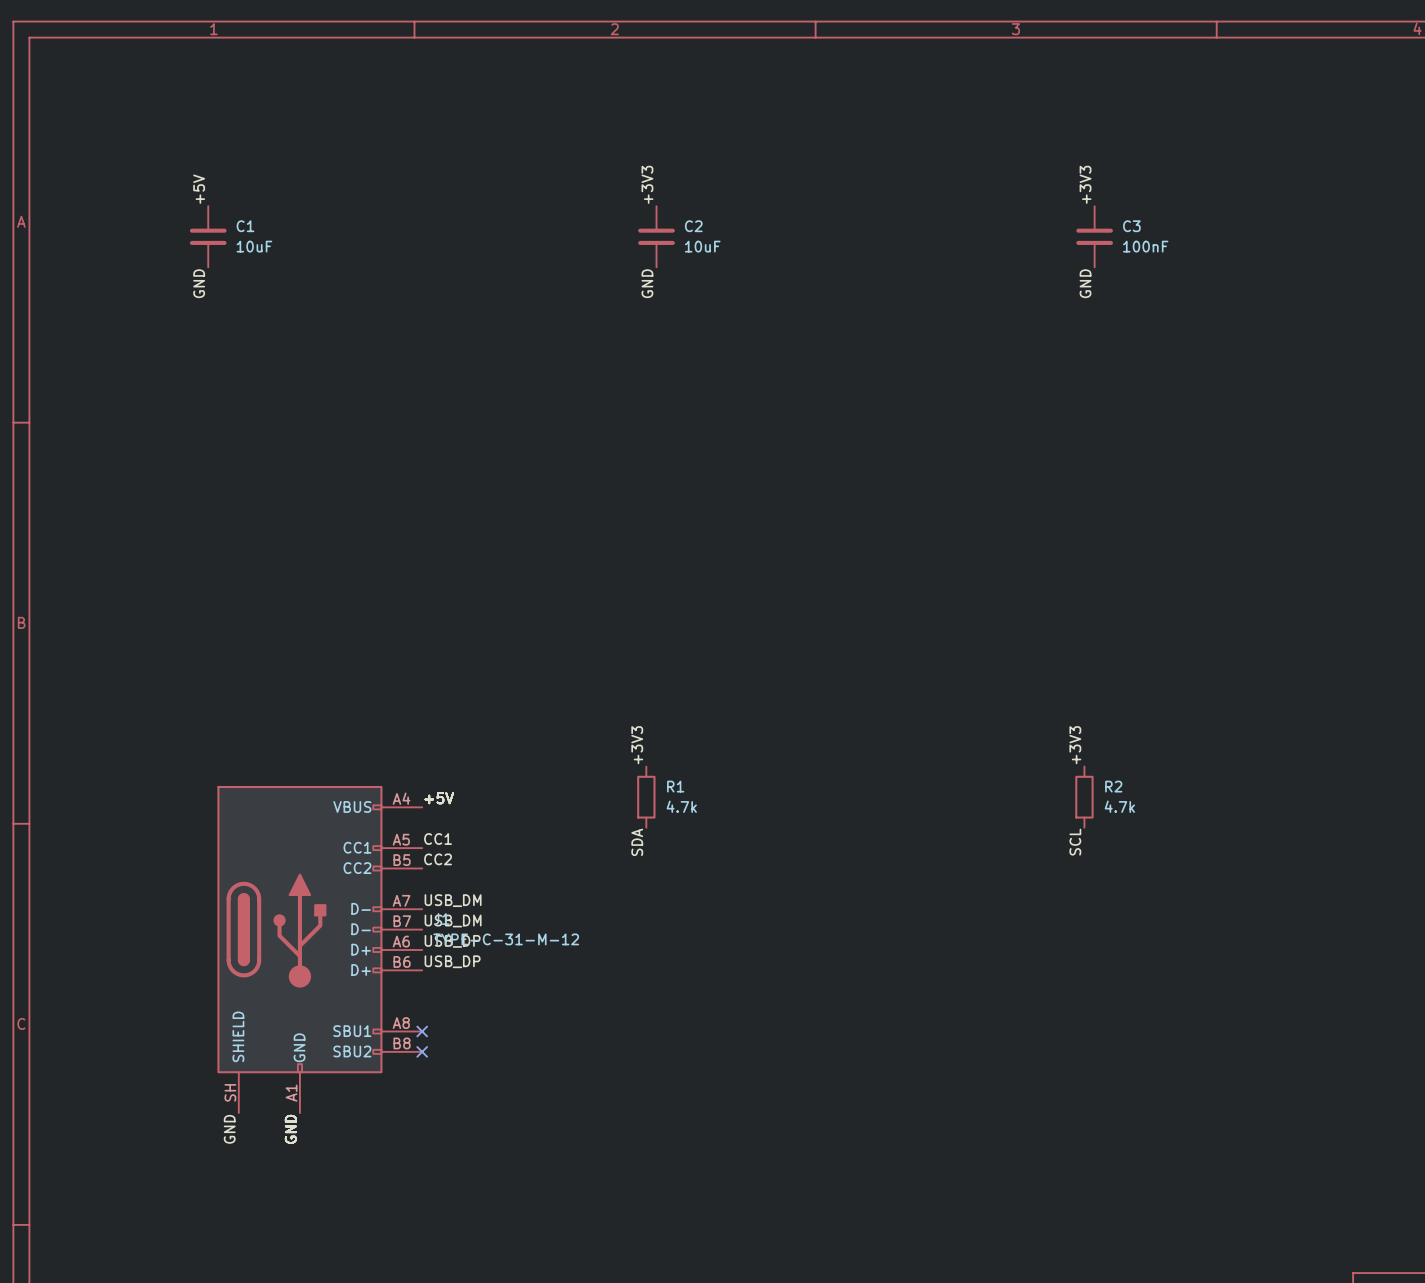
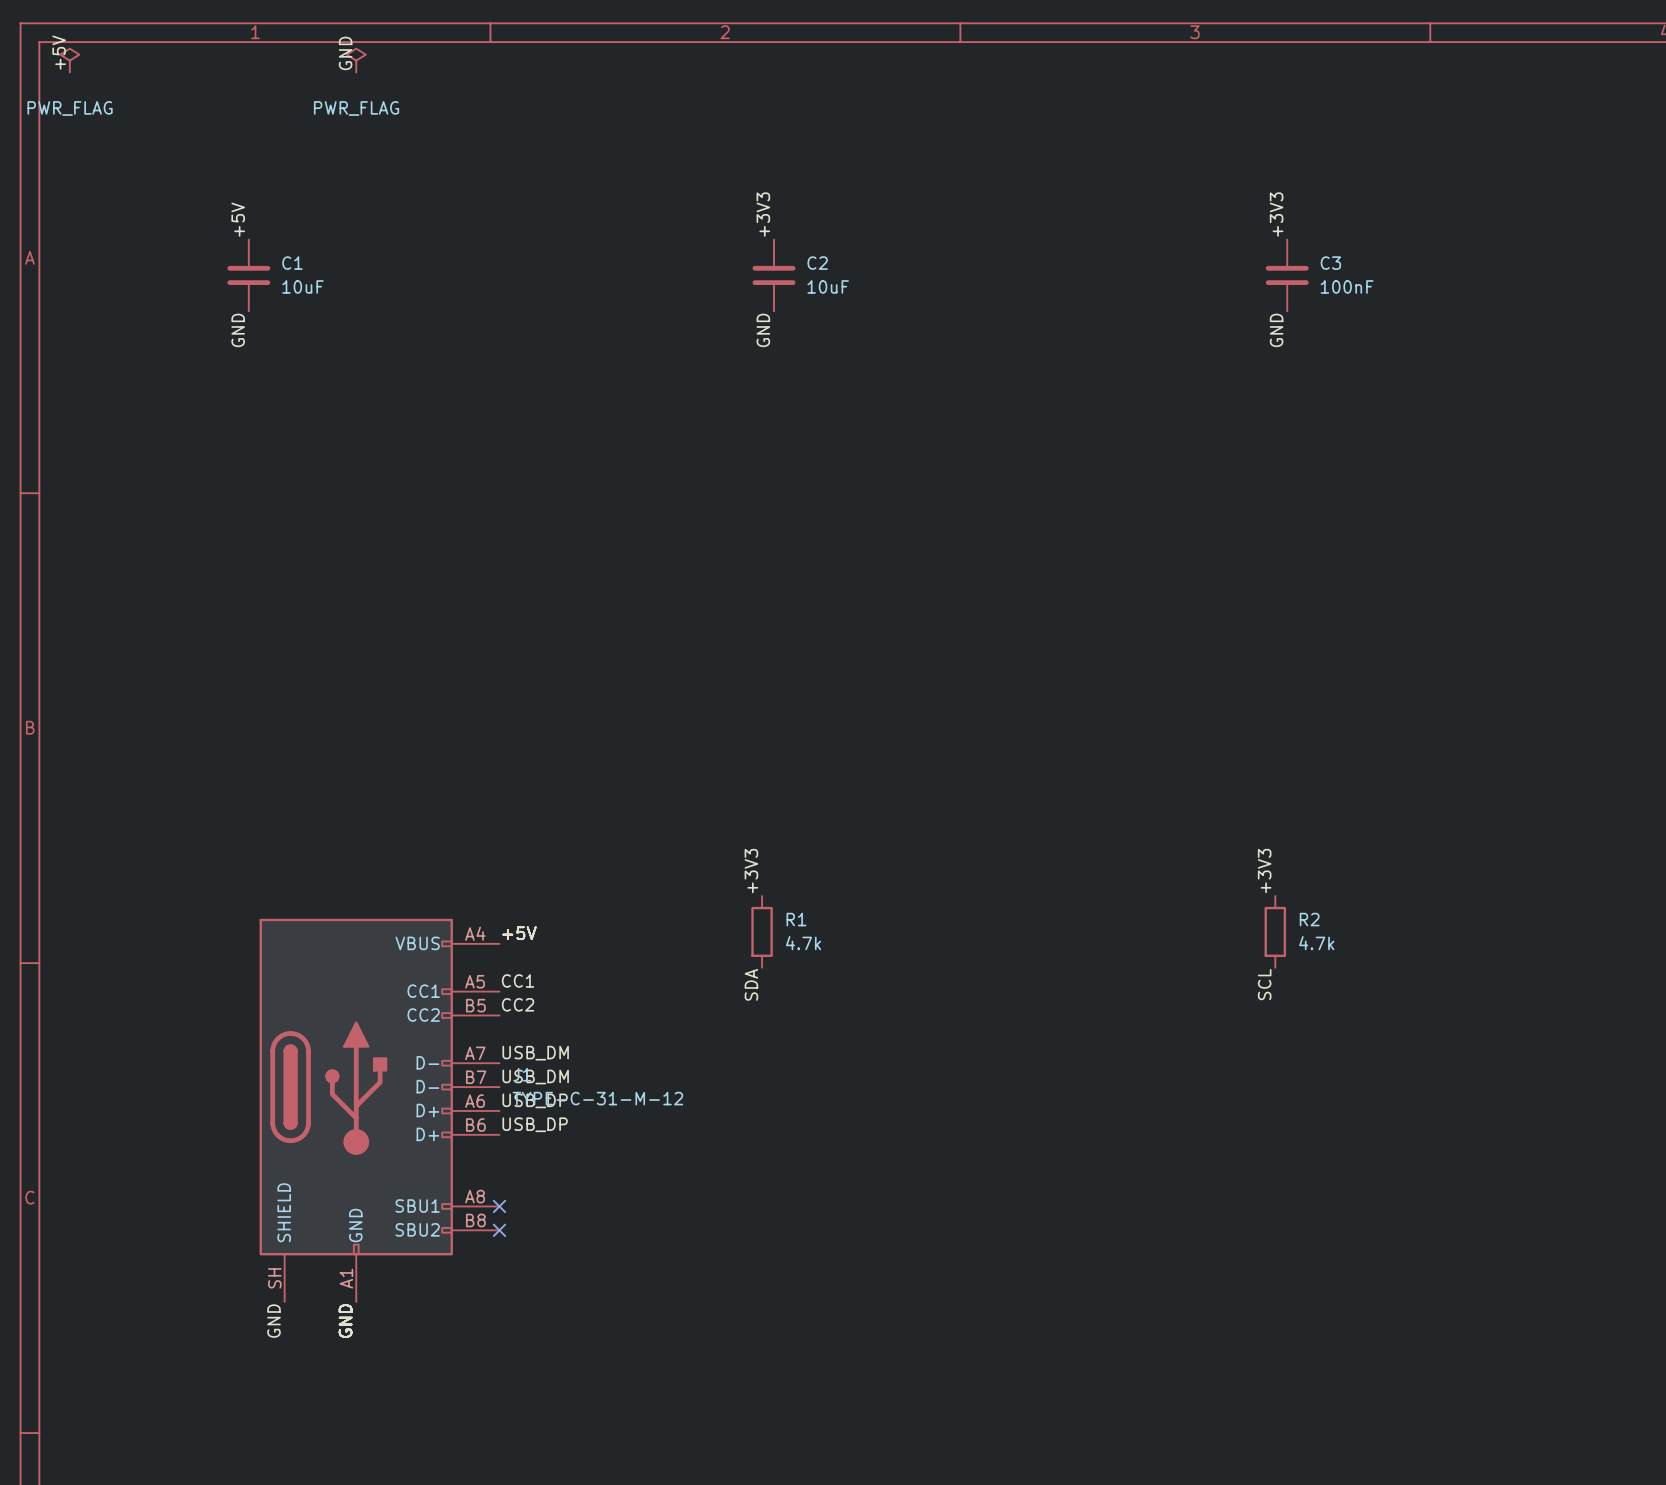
label: none -> +5V (59, 52)
label: none -> GND (345, 53)
power symbol: none -> PWR_FLAG (69, 60)
power symbol: none -> PWR_FLAG (356, 60)

